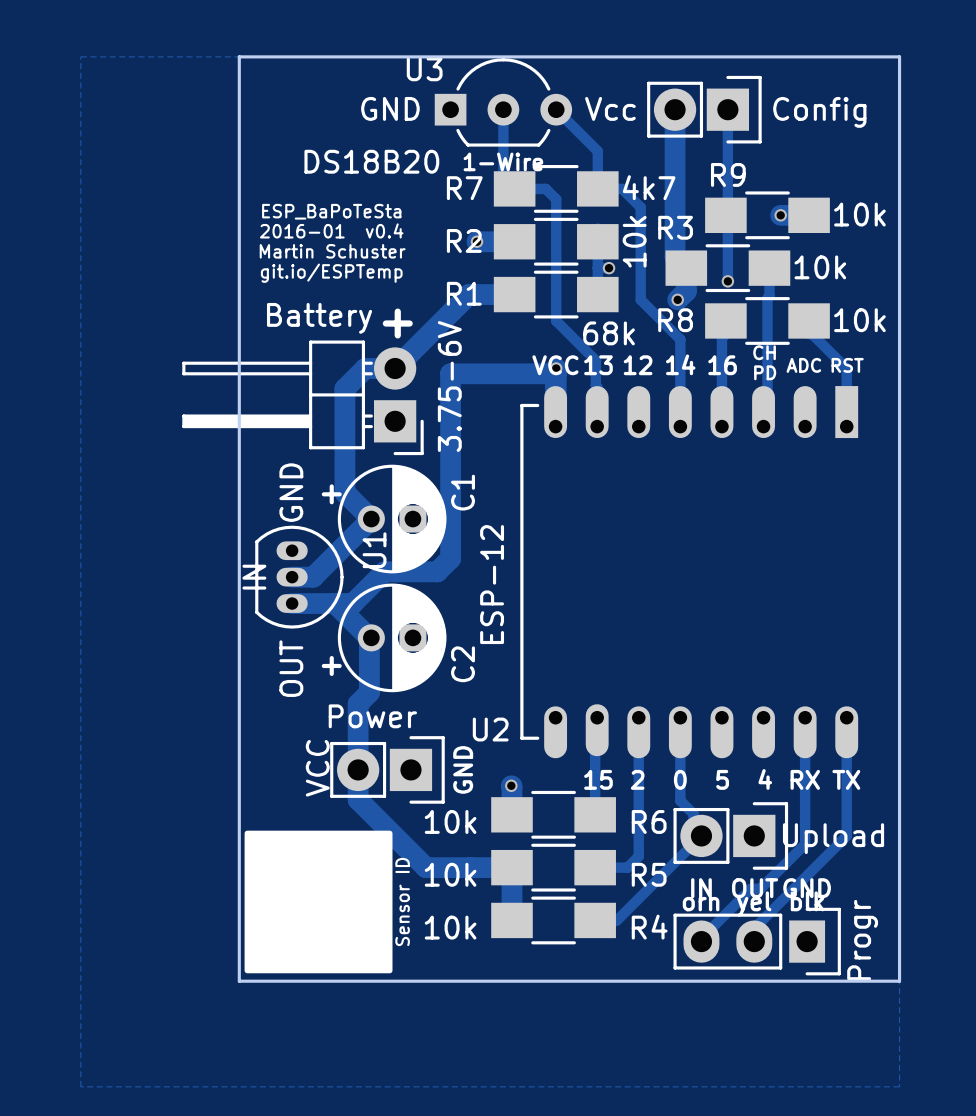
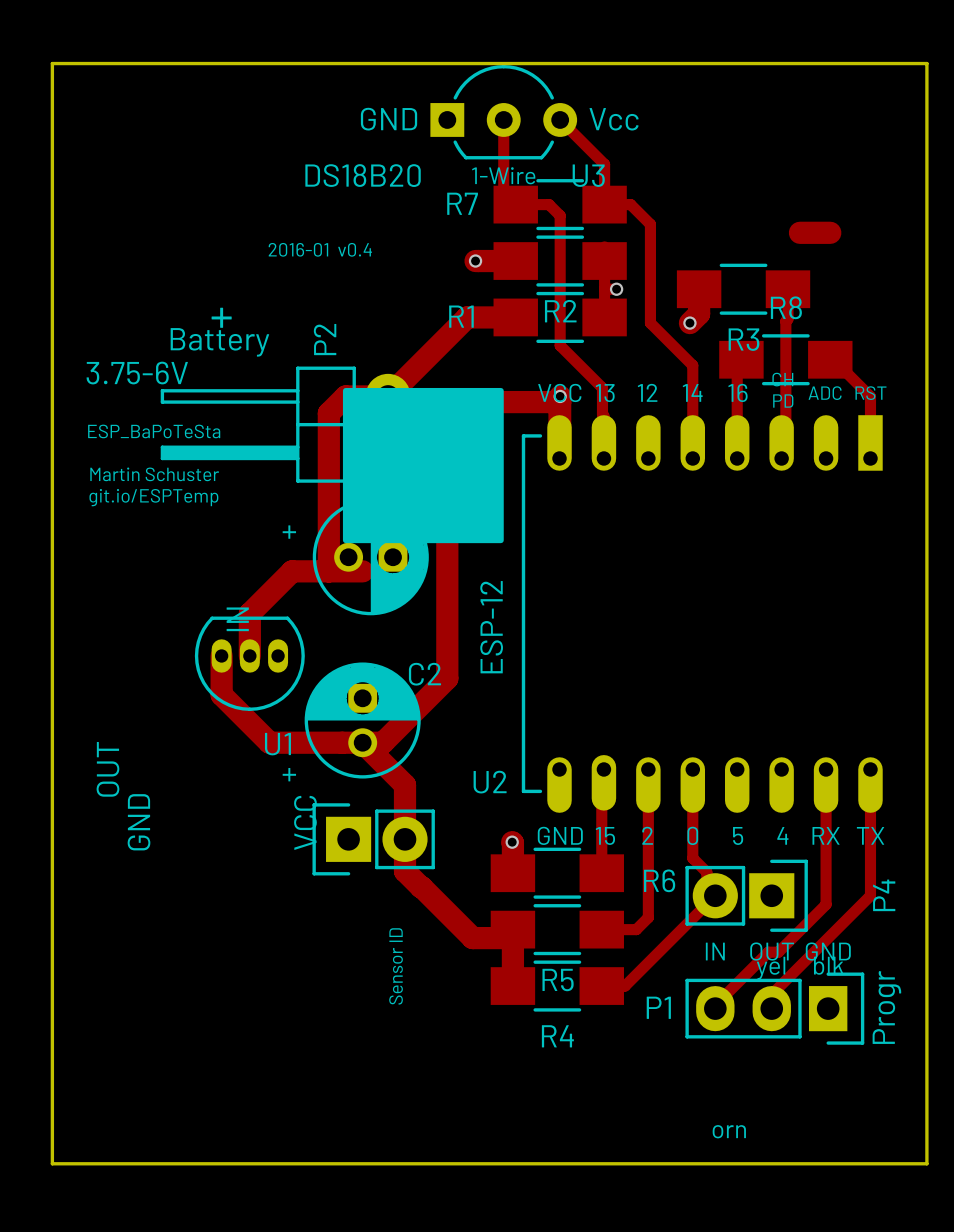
board edge: (239, 56) (239, 981) (899, 981) -> (221, 63) (52, 63) (52, 1163) (926, 1163) (926, 1050)
U3 name position: U3 (424, 69) -> U3 (588, 175)
track: (675, 109) (675, 256) (686, 268) -> none
part: Config (704, 109) -> none
track: (727, 109) (727, 213) (725, 215) (727, 217) (727, 281) -> none
R7 value: 4k7 (649, 187) -> none
text position: ESP_BaPoTeSta (331, 211) -> ESP_BaPoTeSta (154, 431)
R9: 10k (767, 215) -> none
via: (780, 215) -> none
R3 name position: R3 (675, 227) -> R3 (744, 339)
R2 name position: R2 (464, 240) -> R2 (560, 311)
R2 value: 10k (634, 241) -> none
text position: Martin Schuster (332, 251) -> Martin Schuster (154, 474)
R3 value: 10k (820, 267) -> none
text position: git.io/ESPTemp (331, 273) -> git.io/ESPTemp (153, 497)
via: (727, 281) -> none
text: none -> + (221, 317)
P2 name: none -> P2 (325, 339)
P2 value position: Battery (319, 318) -> Battery (219, 342)
R8 name position: R8 (675, 320) -> R8 (786, 307)
R8 position: (767, 320) -> (785, 359)
R8 value: 10k (859, 320) -> none
text: + (397, 323) -> none
R1 value: 68k (609, 333) -> none
drawing: none -> [342, 387, 504, 544]
track: (365, 368) (344, 388) (344, 492) (371, 519) (313, 577) (292, 577) -> (356, 396) (345, 396) (328, 413) (328, 571)
text rotation: 0° (449, 386) -> 90° clockwise (137, 373)
text position: 3.75-6V (449, 386) -> 3.75-6V (137, 373)
text: GND (291, 492) -> none
text position: + (331, 494) -> + (289, 532)
C1 position: (392, 519) -> (370, 557)
track: none -> (362, 571) (292, 571) (249, 613) (249, 655)
track: (450, 558) (437, 571) (384, 571) (352, 603) (292, 603) -> (447, 599) (447, 678) (383, 742) (269, 742) (221, 694) (221, 655)
U1 rotation: 0° (299, 577) -> 90° clockwise (249, 663)
track: (335, 603) (369, 637) (369, 692) (358, 703) (358, 799) (425, 867) (511, 867) -> none
C2 rotation: 0° (392, 637) -> 90° counterclockwise (362, 720)
C2 name position: C2 (463, 664) -> C2 (424, 674)
text position: + (331, 665) -> + (289, 774)
text position: OUT (291, 668) -> OUT (107, 769)
track: none -> (362, 742) (405, 785) (405, 871) (472, 938) (512, 938)
part value: Power (372, 716) -> none
text: none -> GND (138, 822)
part rotation: 0° (387, 769) -> 180° (373, 839)
text rotation: 0° (463, 769) -> 90° clockwise (560, 835)
text position: GND (463, 769) -> GND (560, 835)
R6 value: 10k (450, 821) -> none
drawing: [244, 830, 393, 974] -> none
P4 name: none -> P4 (884, 895)
P4 value: Upload (833, 838) -> none
R5 value: 10k (450, 874) -> none
R5 name position: R5 (649, 874) -> R5 (558, 980)
text position: orn (701, 904) -> orn (729, 1131)
R4 value: 10k (450, 927) -> none
R4 name position: R4 (649, 927) -> R4 (557, 1036)
P1 name: none -> P1 (658, 1007)

